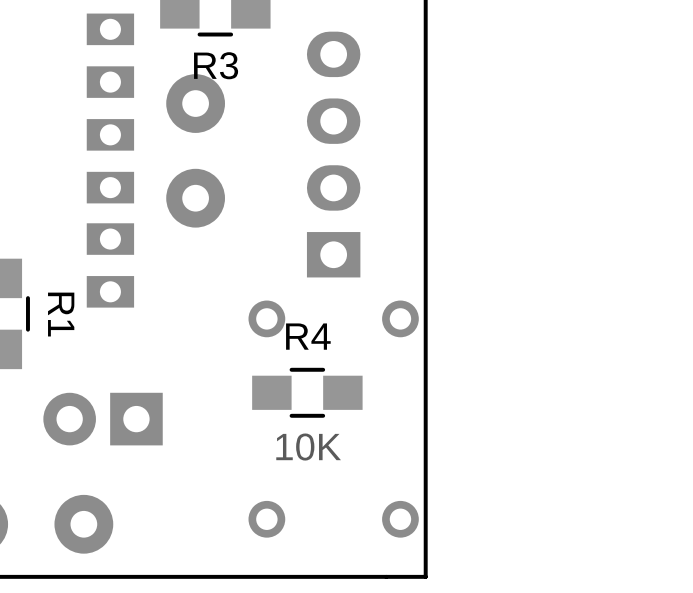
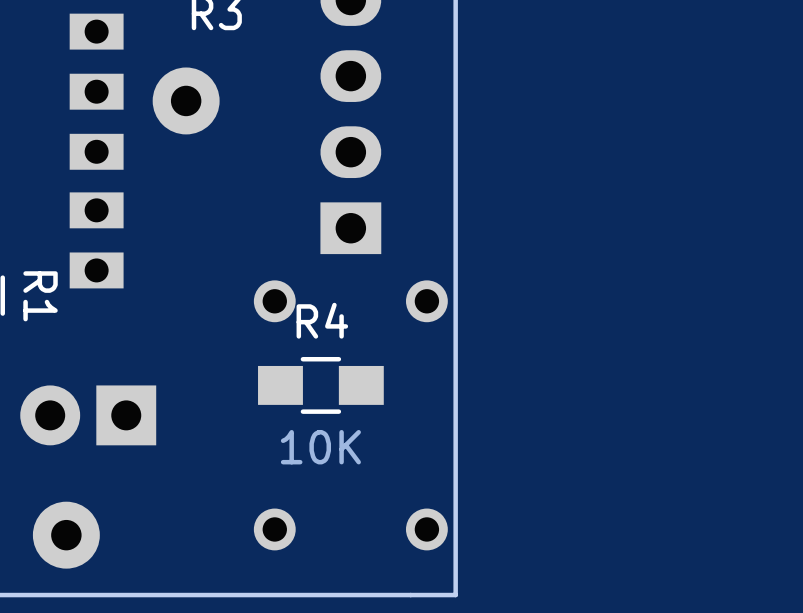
part: (195, 103) -> none
part: none -> (186, 100)
part: (195, 198) -> none

